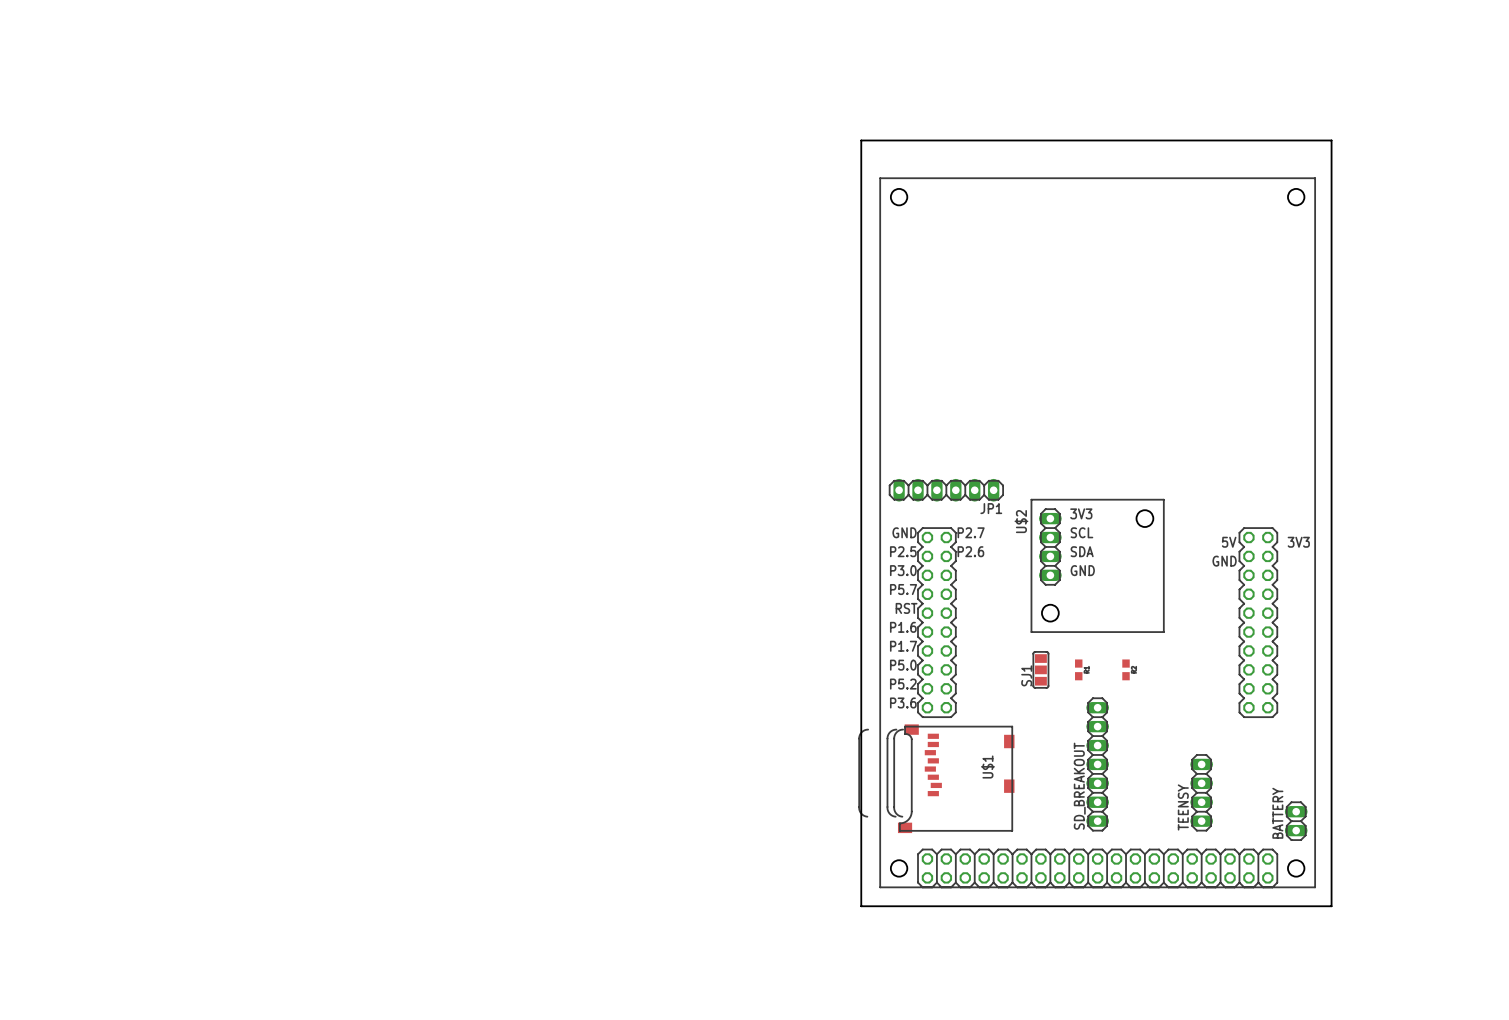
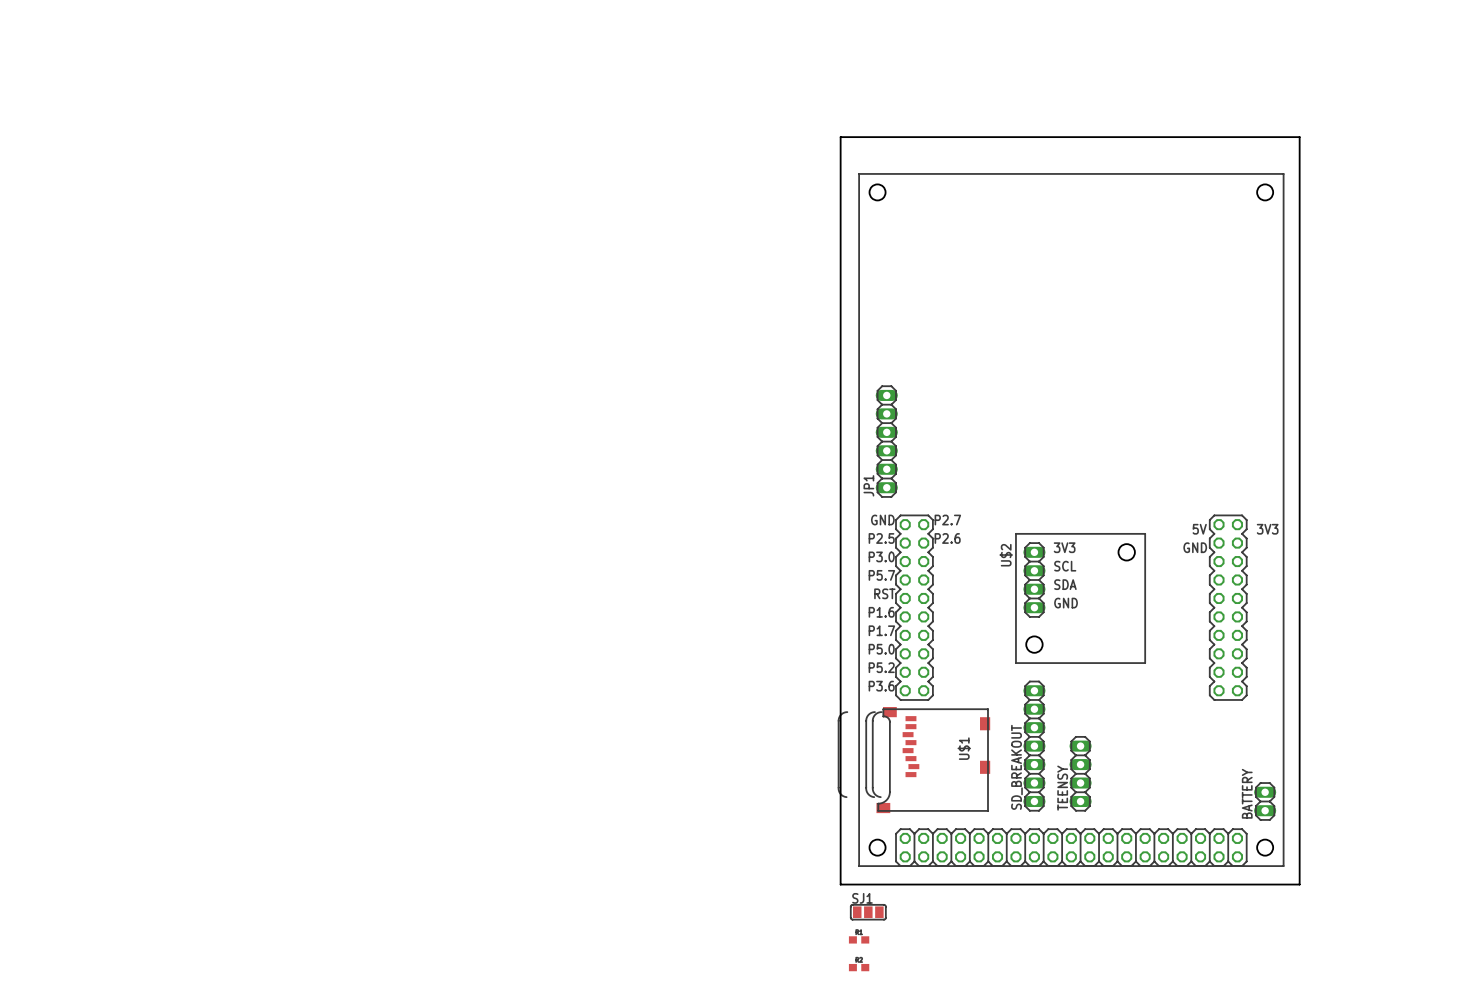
JP1 rotation: 0° (946, 490) -> 90° clockwise (886, 441)
U$2 position: (1097, 565) -> (1080, 598)
SJ1 rotation: 0° (1040, 669) -> 90° clockwise (868, 912)
SJ1 position: (1040, 669) -> (868, 912)
part rotation: 0° (1078, 669) -> 90° clockwise (859, 939)
part position: (1078, 669) -> (859, 939)
part rotation: 0° (1126, 669) -> 90° clockwise (859, 967)
part position: (1126, 669) -> (859, 967)
SD_BREAKOUT position: (1097, 764) -> (1034, 746)
TEENSY position: (1201, 792) -> (1080, 773)

